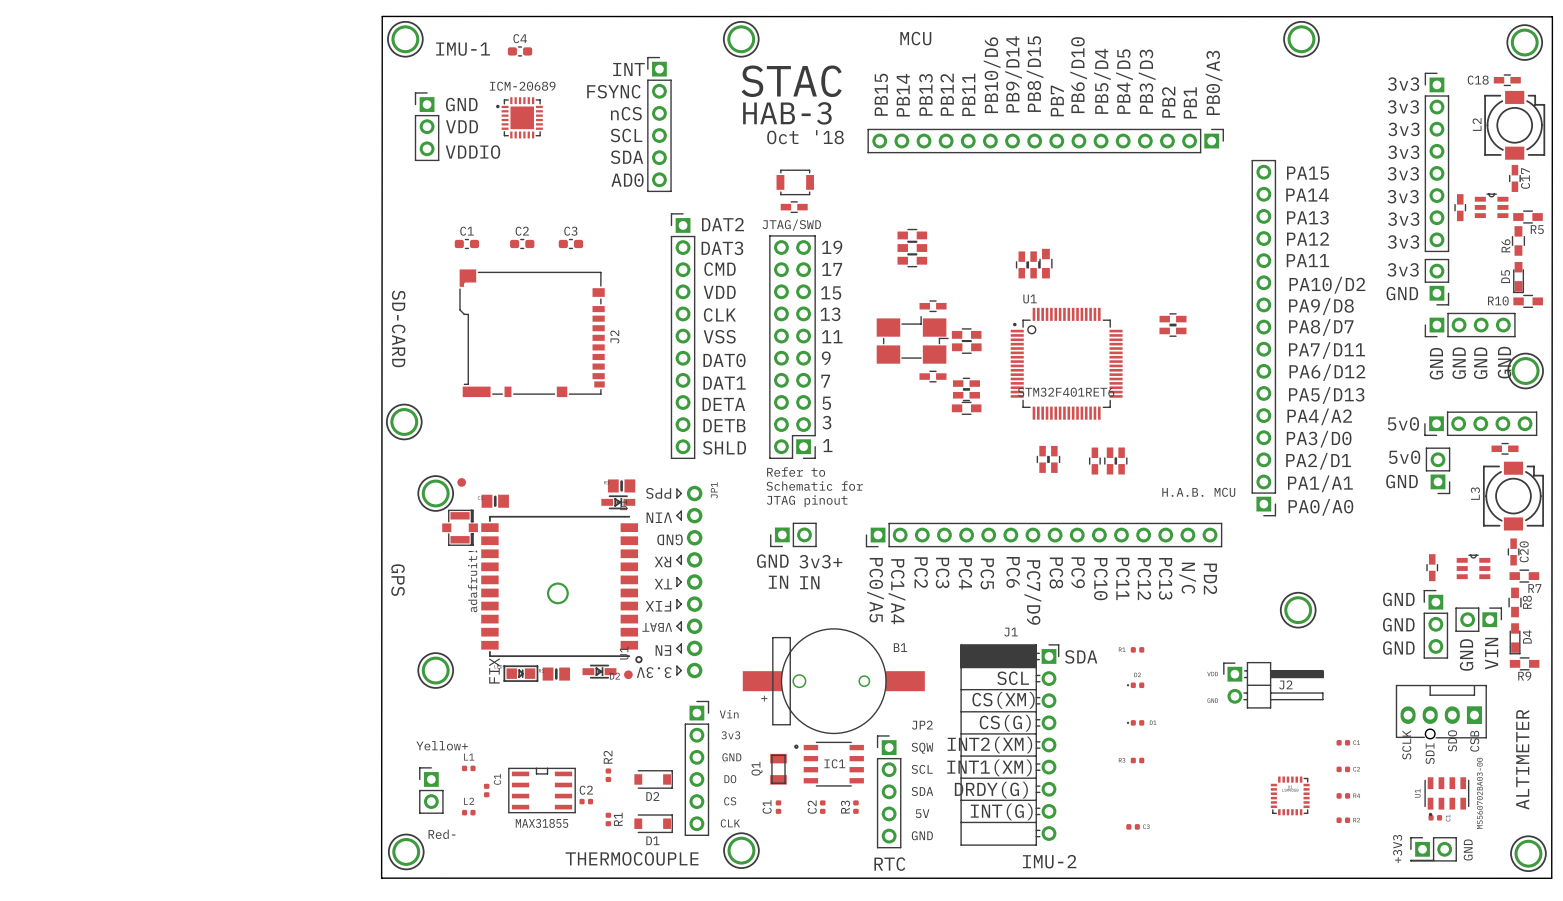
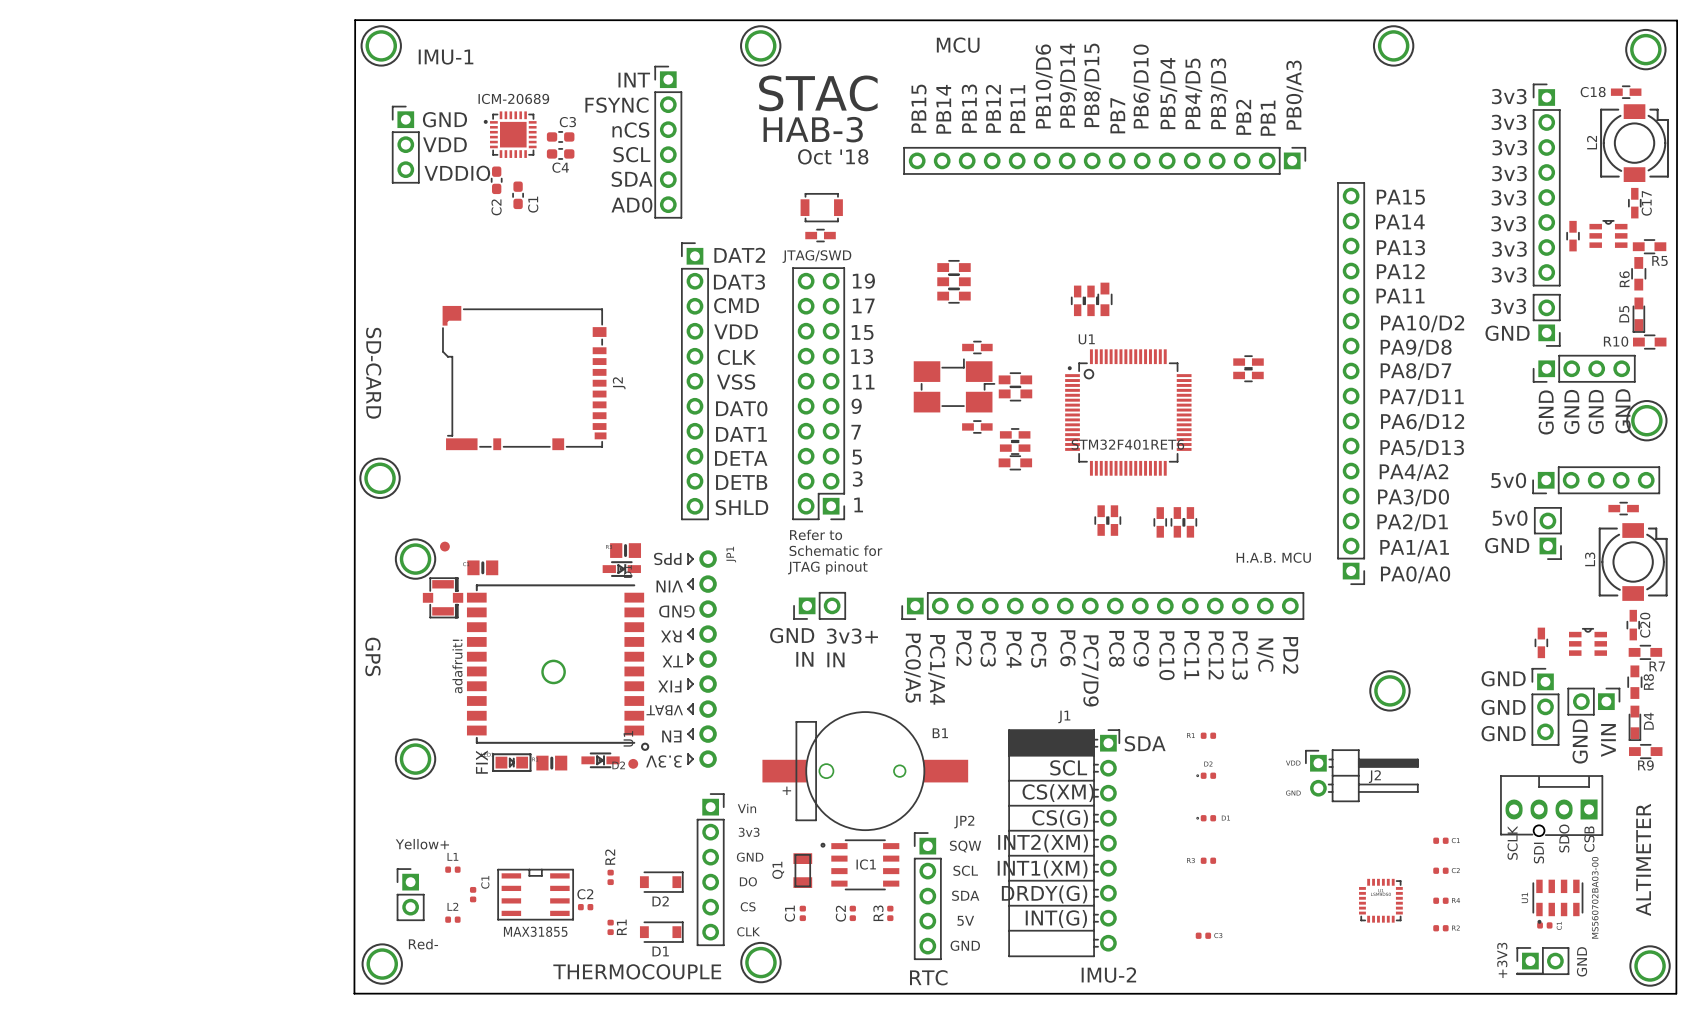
C4 name position: C4 (520, 38) -> C4 (560, 167)
C4 position: (520, 51) -> (560, 153)
C2 name position: C2 (522, 231) -> C2 (496, 207)
C3 name position: C3 (570, 231) -> C3 (567, 122)
C1 rotation: 0° (466, 243) -> 90° clockwise (518, 195)
C1 position: (466, 243) -> (518, 195)
C2 rotation: 0° (522, 243) -> 90° clockwise (496, 180)
C2 position: (522, 243) -> (496, 180)
C3 position: (570, 243) -> (560, 136)

